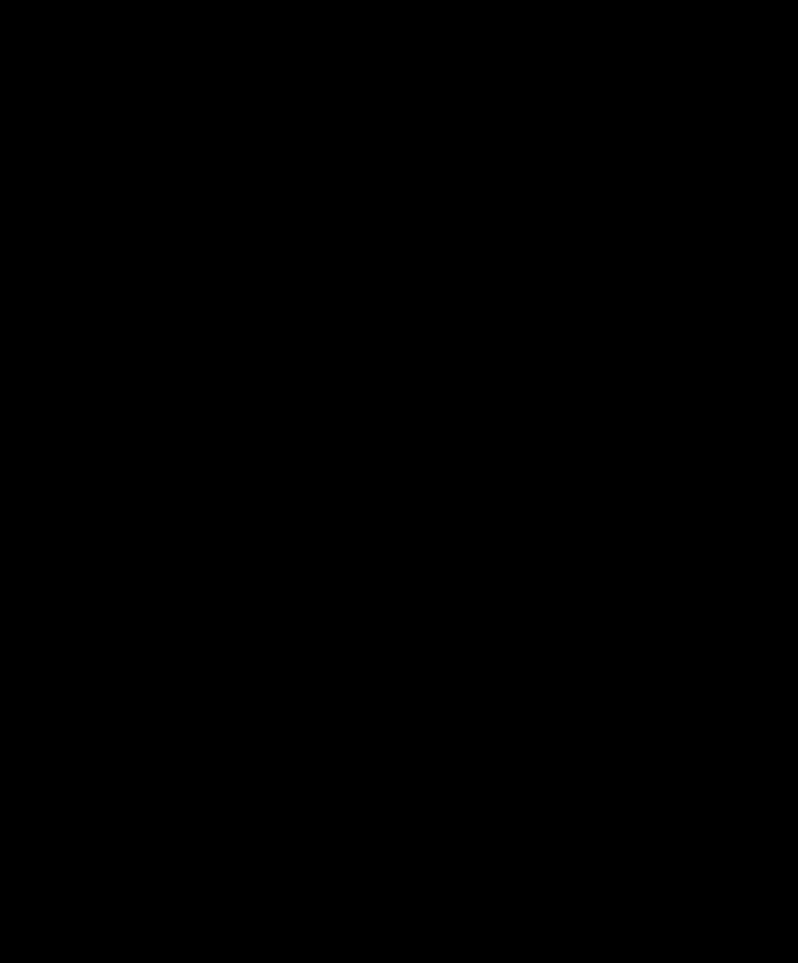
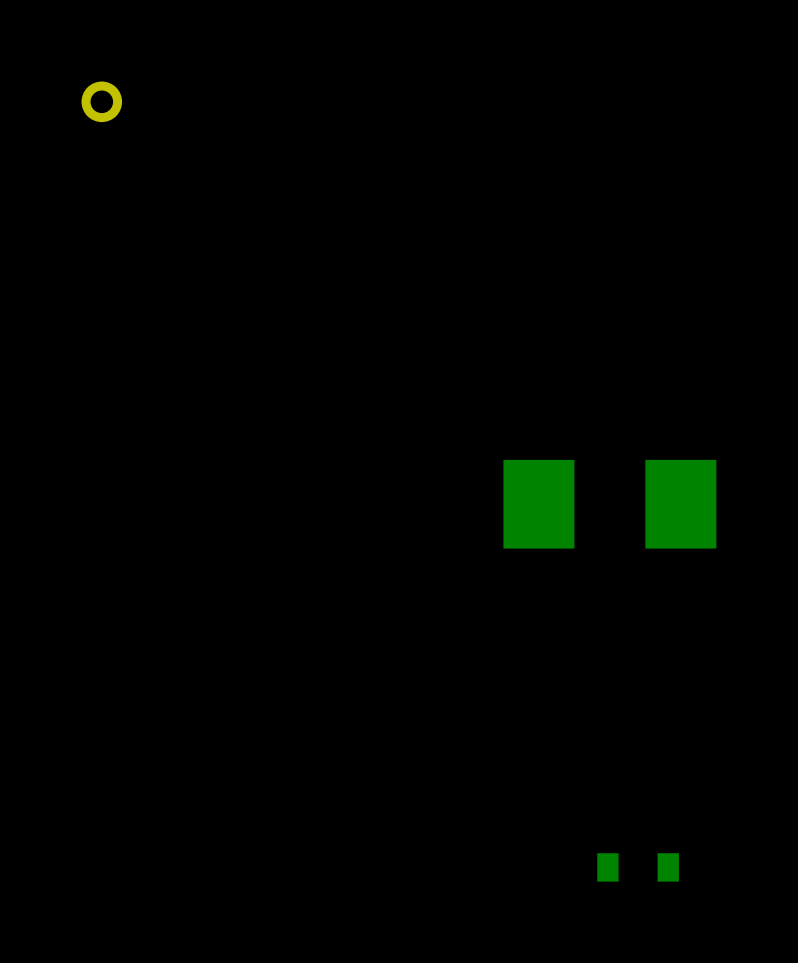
part: none -> (101, 101)
part: none -> (609, 504)
part: none -> (638, 867)

